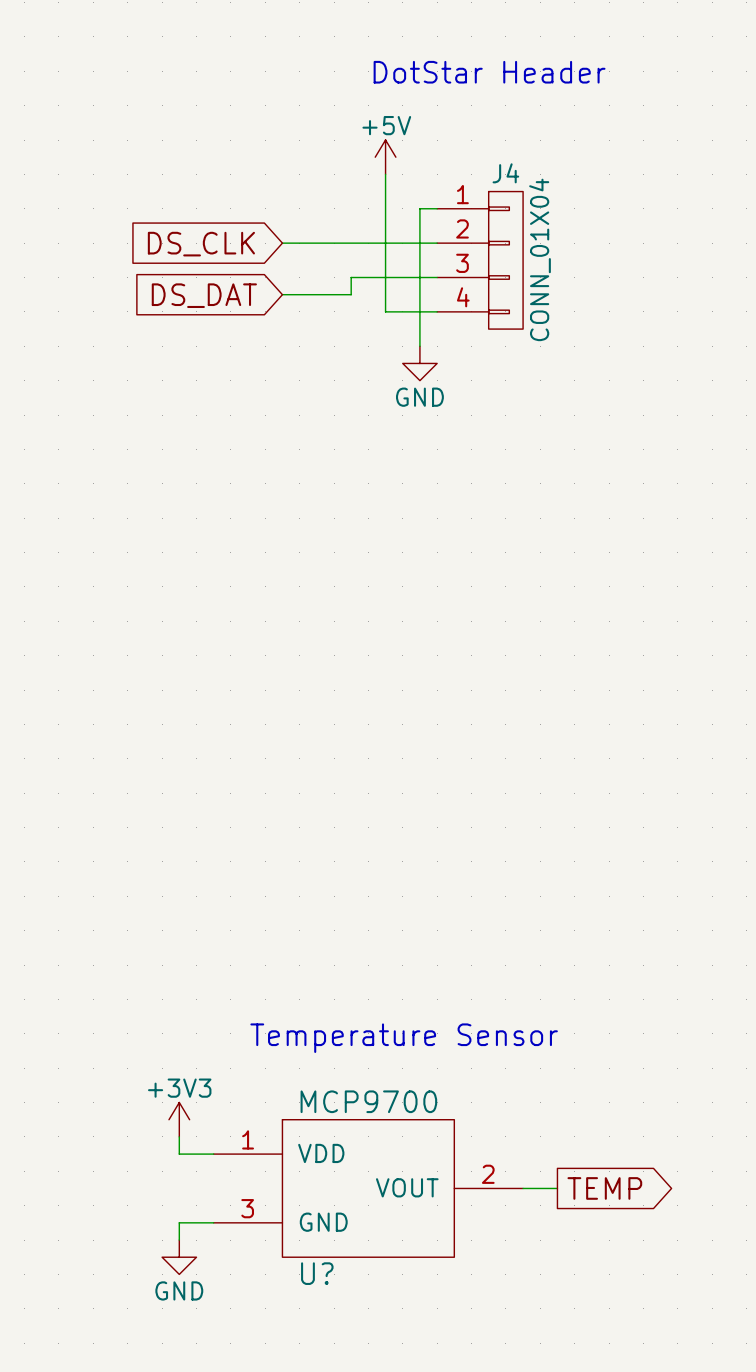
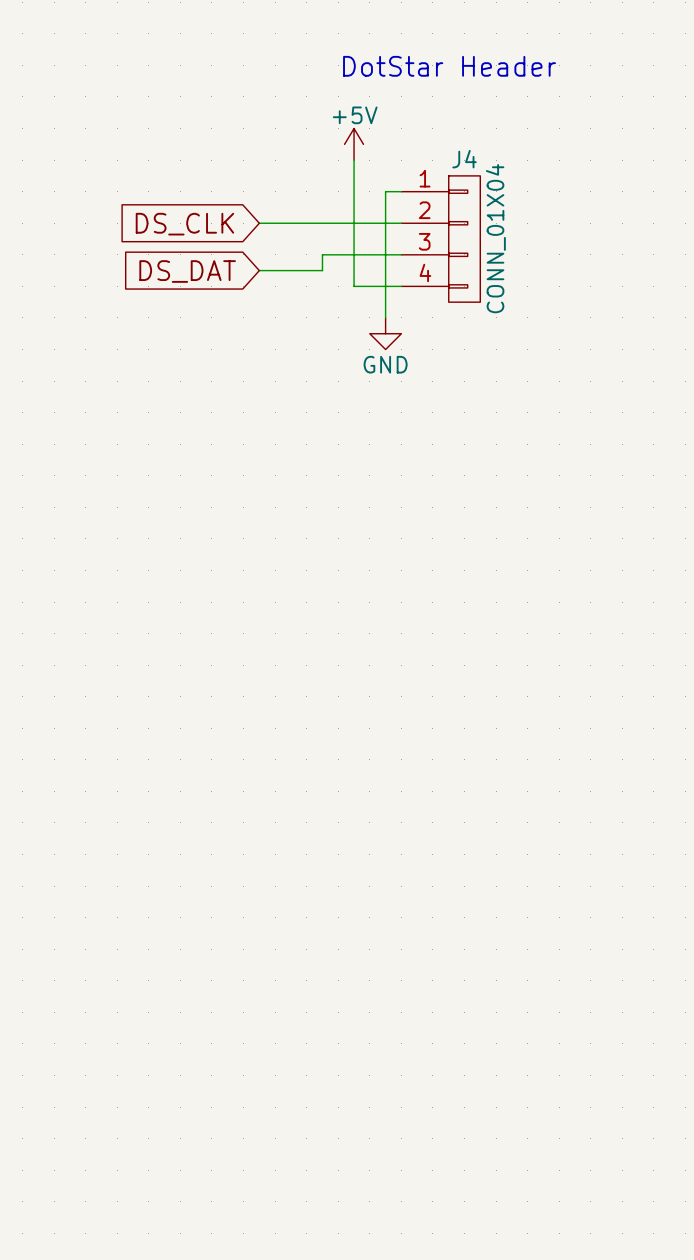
text: Temperature Sensor (404, 1038) -> none
power symbol: +3V3 (179, 1119) -> none
wire: (179, 1136) (179, 1154) (213, 1154) -> none
U?: MCP9700 (368, 1188) -> none
wire: (523, 1188) (557, 1188) -> none
global label: TEMP (604, 1188) -> none
wire: (213, 1222) (179, 1222) (179, 1240) -> none
power symbol: GND (179, 1257) -> none

